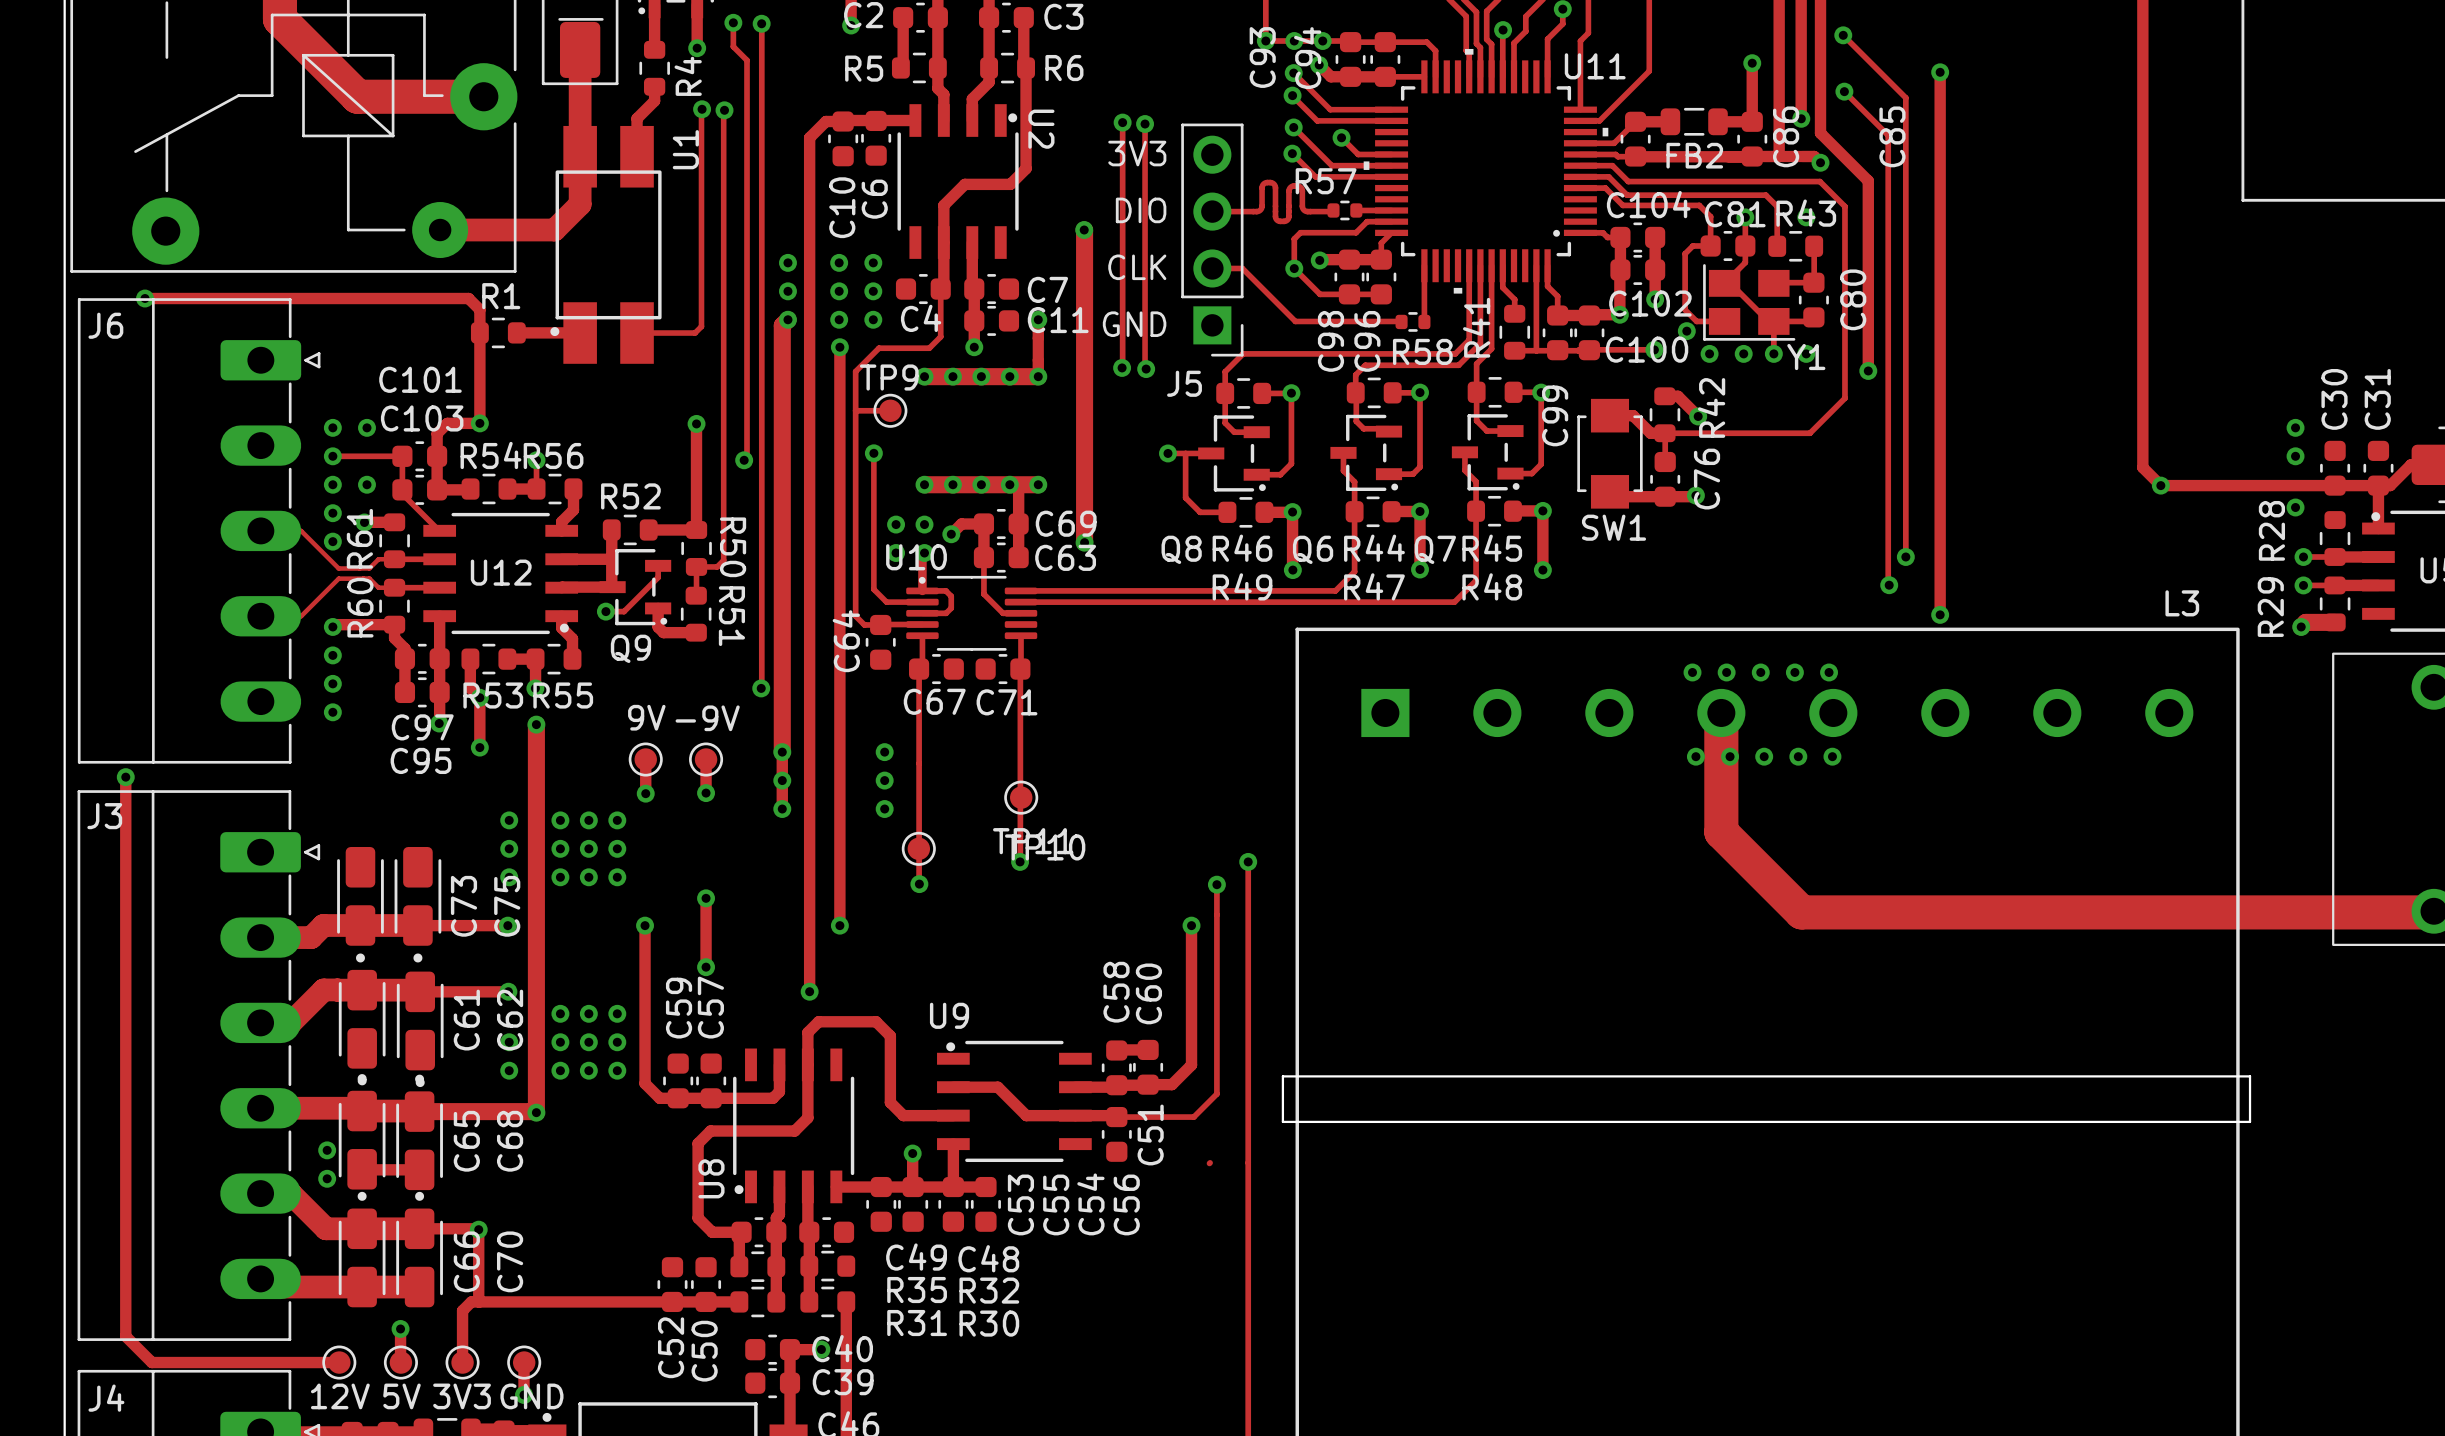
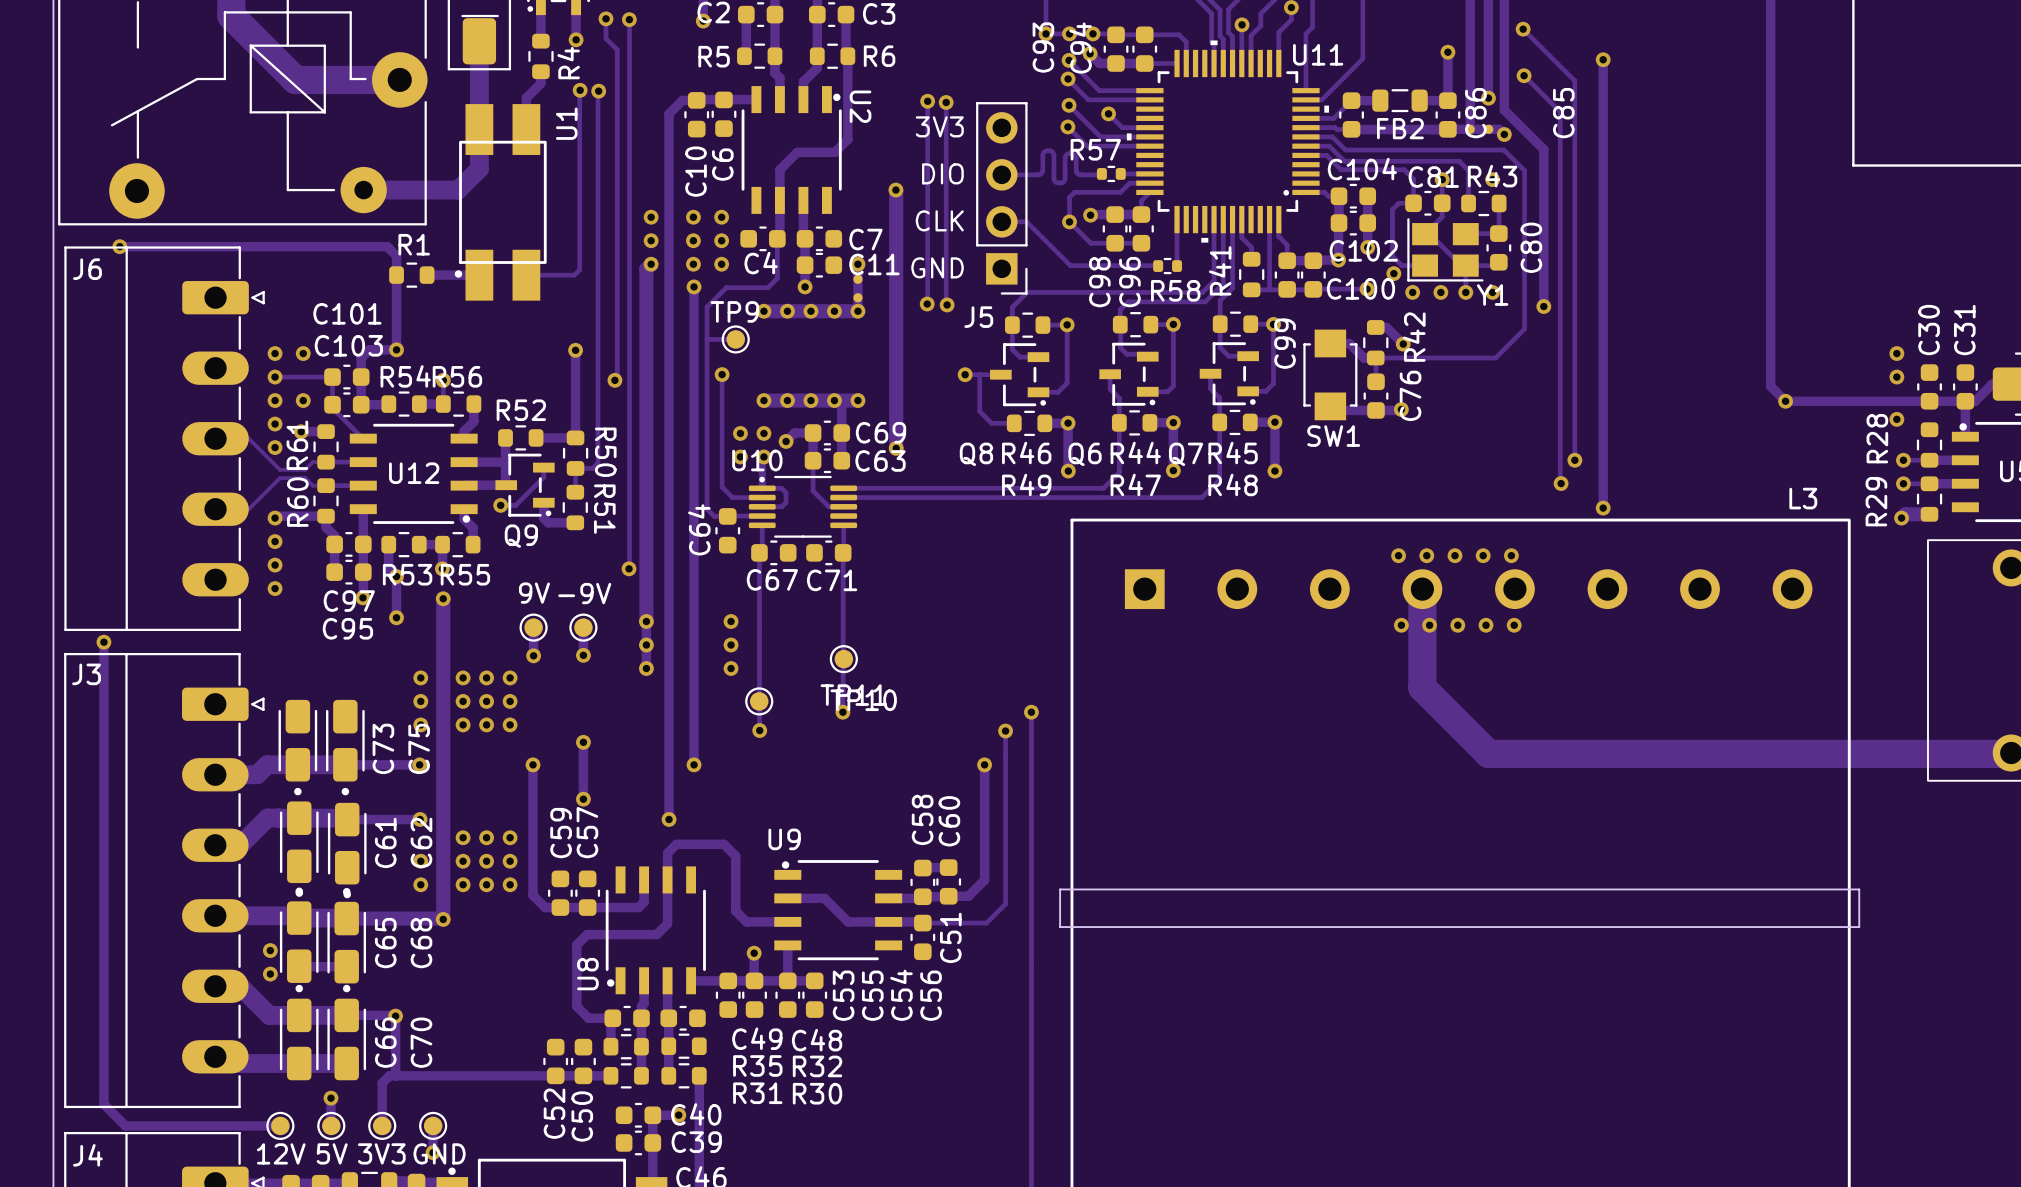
track: (1210, 1162) (1209, 1163) -> none

